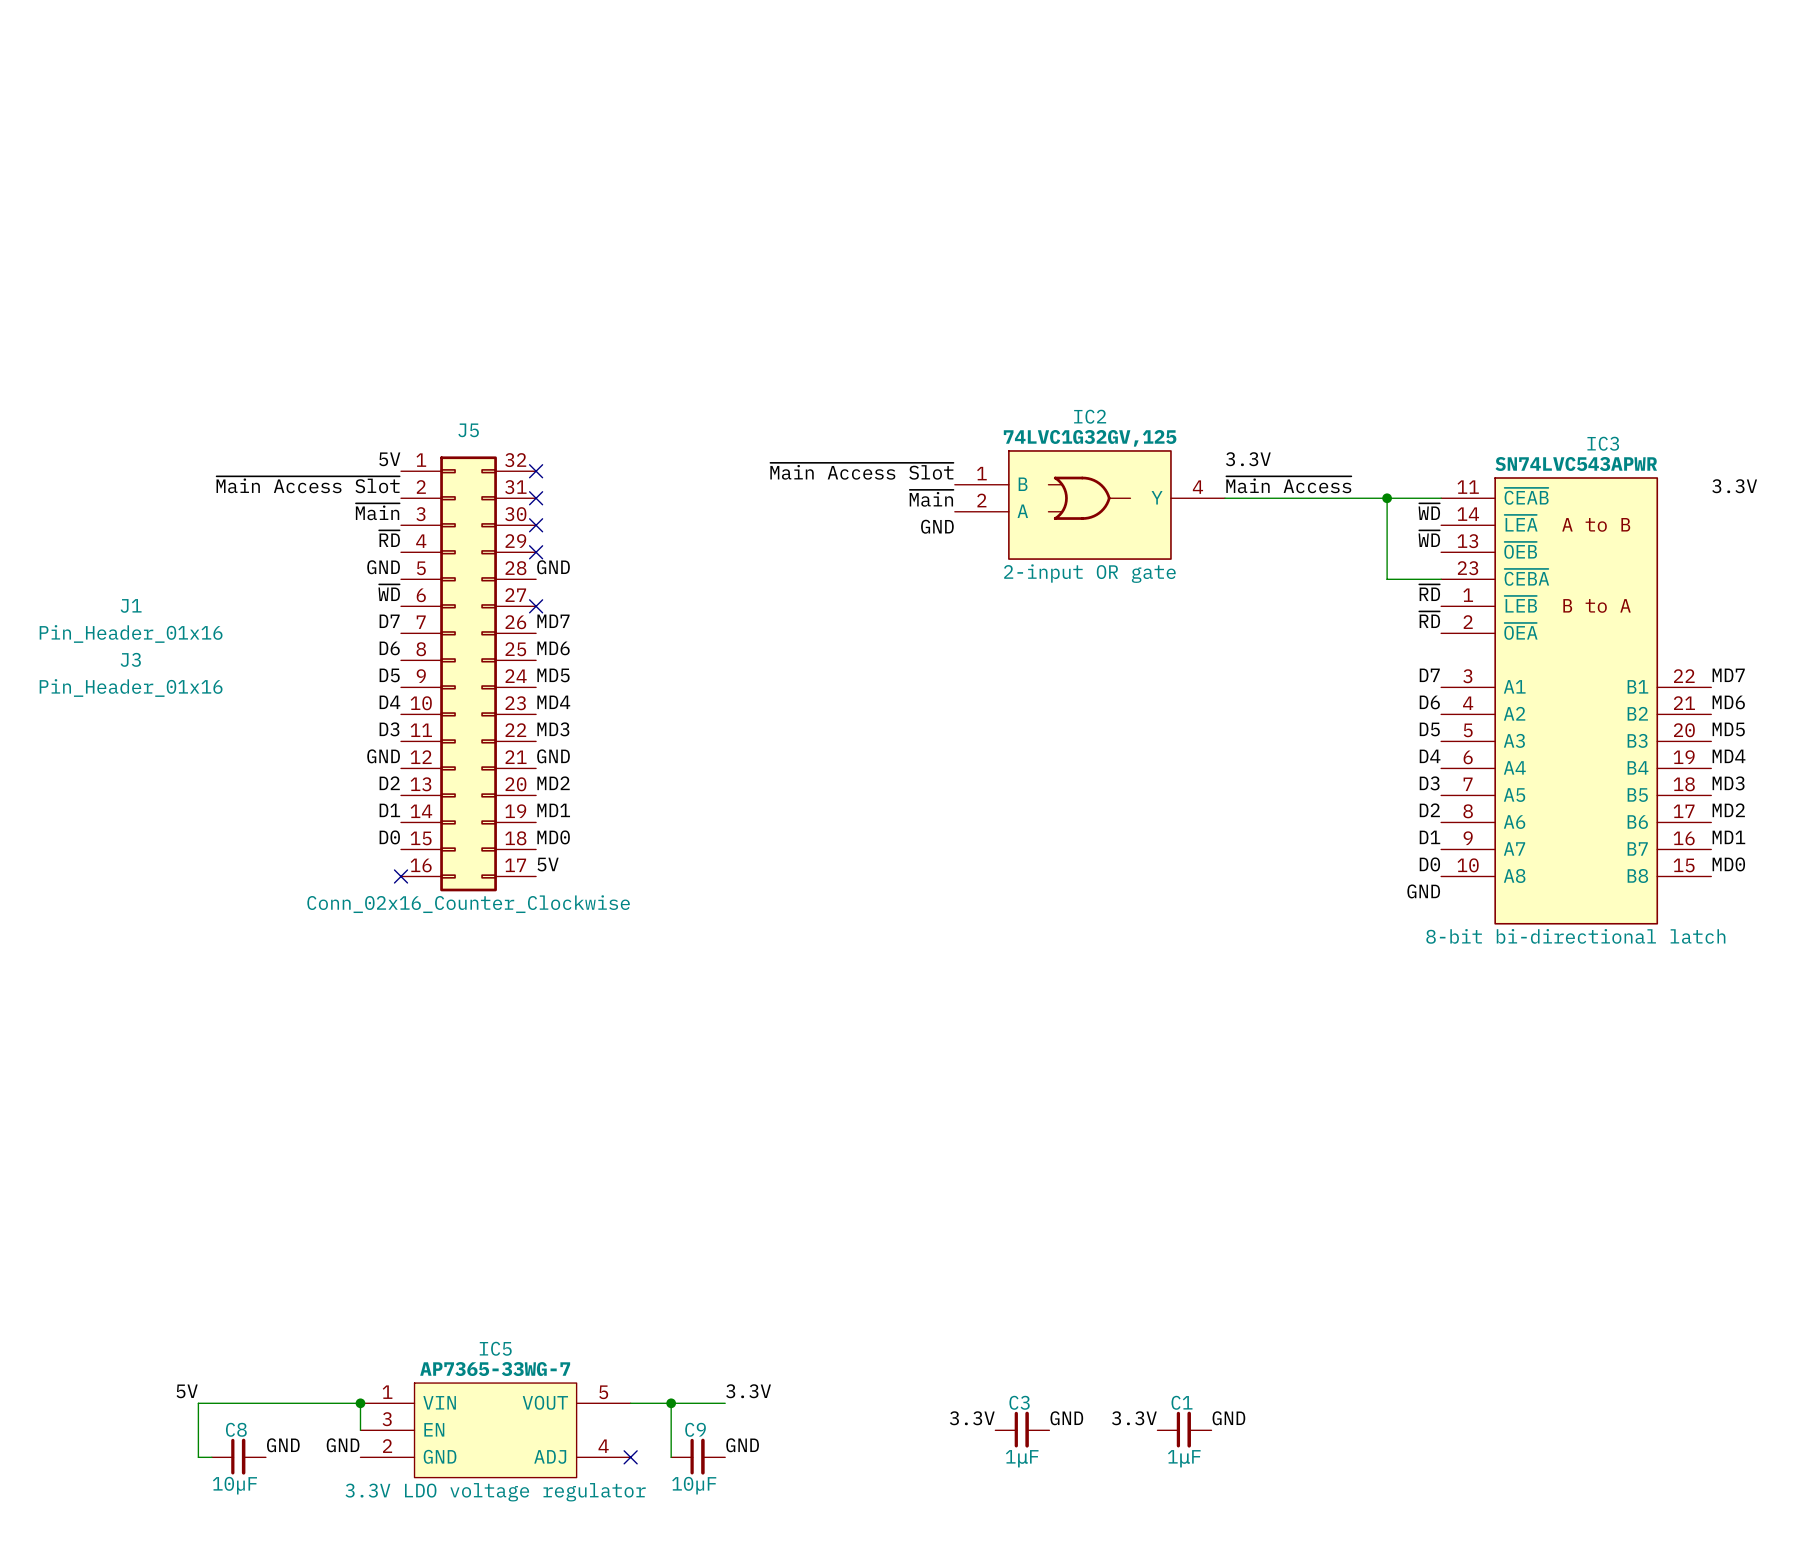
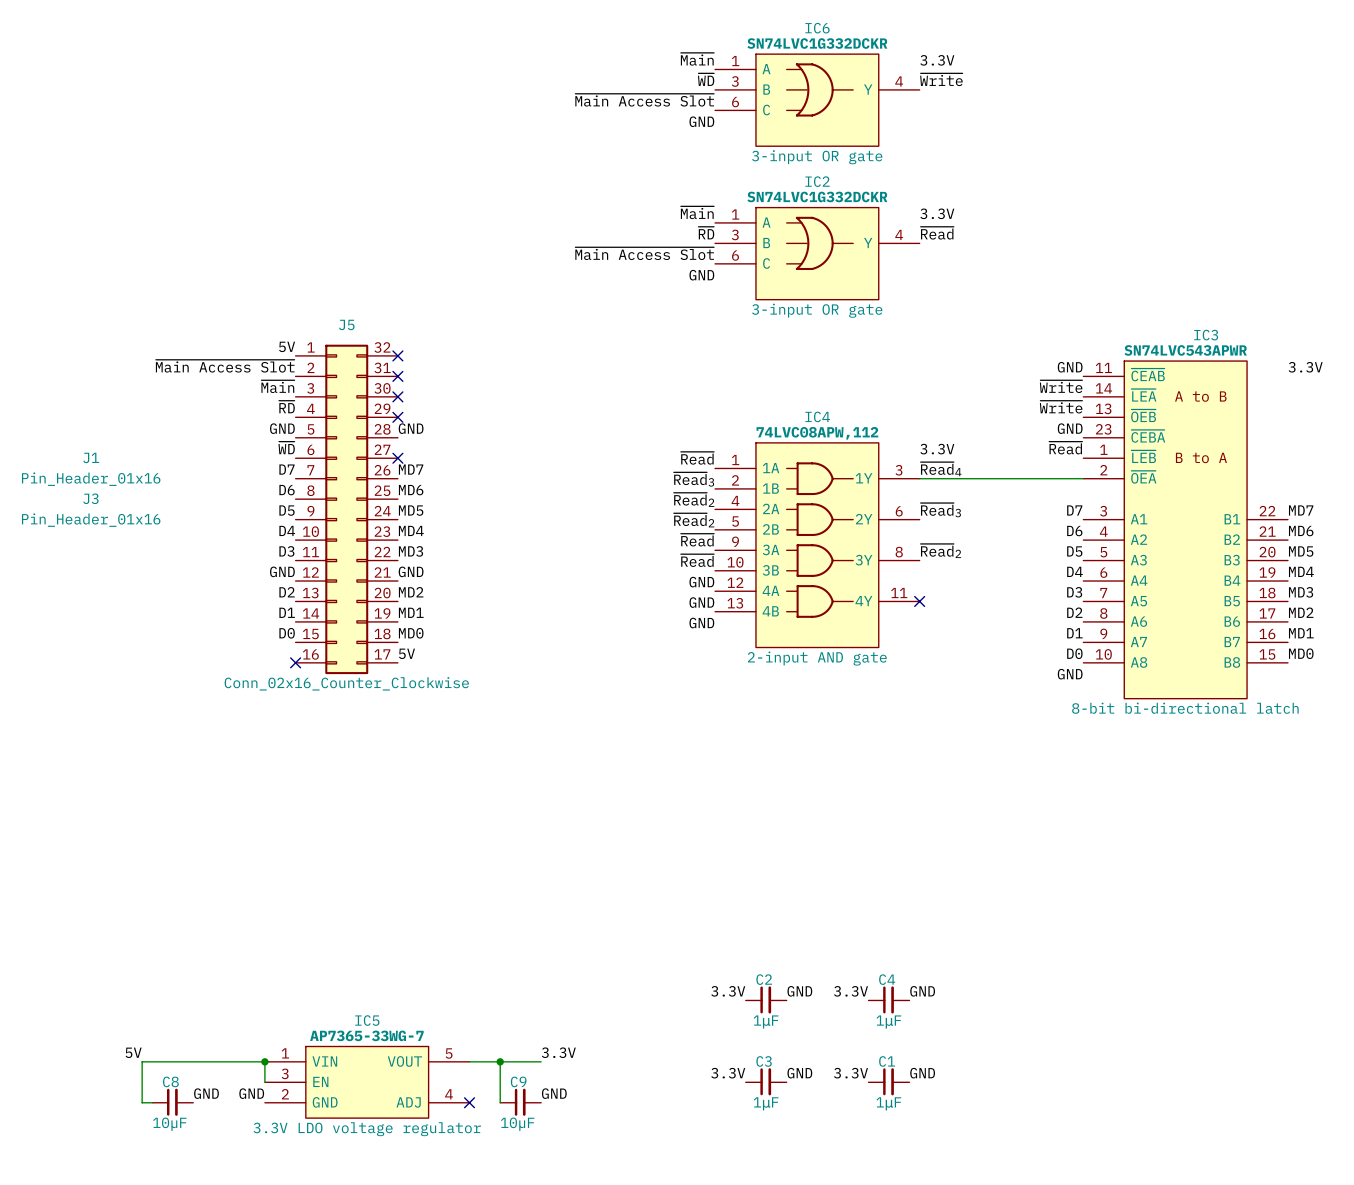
label: none -> ~{Main} (697, 59)
label: none -> 3.3V (937, 60)
label: none -> ~{WD} (706, 79)
label: none -> ~{Write} (941, 79)
label: none -> ~{Main Access Slot} (644, 100)
IC6: none -> SN74LVC1G332DCKR (817, 100)
label: none -> GND (701, 121)
label: none -> ~{Main} (697, 212)
label: none -> 3.3V (937, 213)
label: none -> ~{RD} (706, 233)
label: none -> ~{Read} (937, 233)
label: none -> GND (701, 275)
IC2 value: 74LVC1G32GV,125 (1090, 438) -> SN74LVC1G332DCKR (817, 196)
IC2 symbol: [954, 450, 1226, 560] -> [715, 206, 920, 301]
label: 3.3V (1248, 459) -> none
label position: ~{Main Access Slot} (861, 471) -> ~{Main Access Slot} (644, 253)
label: ~{Main Access} (1288, 484) -> none
label: none -> GND (1070, 367)
label: ~{Main} (931, 498) -> none
wire: (1225, 498) (1441, 498) -> (919, 478) (1083, 478)
wire: (1387, 498) (1387, 579) (1441, 579) -> none
junction: (1387, 498) -> none
label: ~{WD} (1429, 511) -> ~{Write} (1061, 386)
label: GND (937, 526) -> none
label: ~{WD} (1429, 538) -> ~{Write} (1061, 407)
label: none -> GND (1070, 428)
IC2 text: 2-input OR gate (1089, 573) -> 3-input OR gate (817, 310)
label: ~{RD} (1429, 592) -> ~{Read} (1065, 448)
label: none -> 3.3V (937, 449)
label: none -> ~{Read} (697, 458)
label: ~{RD} (1429, 619) -> none
label: none -> ~{Read}4 (941, 469)
label: none -> ~{Read}3 (693, 479)
label: none -> ~{Read}2 (694, 499)
label: none -> ~{Read}3 (940, 510)
label: none -> ~{Read}2 (694, 520)
label: none -> ~{Read} (697, 540)
IC4: none -> 74LVC08APW,112 (817, 545)
label: none -> ~{Read}2 (940, 551)
label: none -> ~{Read} (697, 560)
label: none -> GND (701, 582)
no-connect mark: none -> (919, 601)
label: none -> GND (701, 602)
label: none -> GND (701, 623)
label: none -> 3.3V (728, 991)
label: none -> GND (799, 991)
label: none -> 3.3V (851, 991)
label: none -> GND (922, 991)
C2: none -> 1μF (766, 999)
C4: none -> 1μF (888, 999)

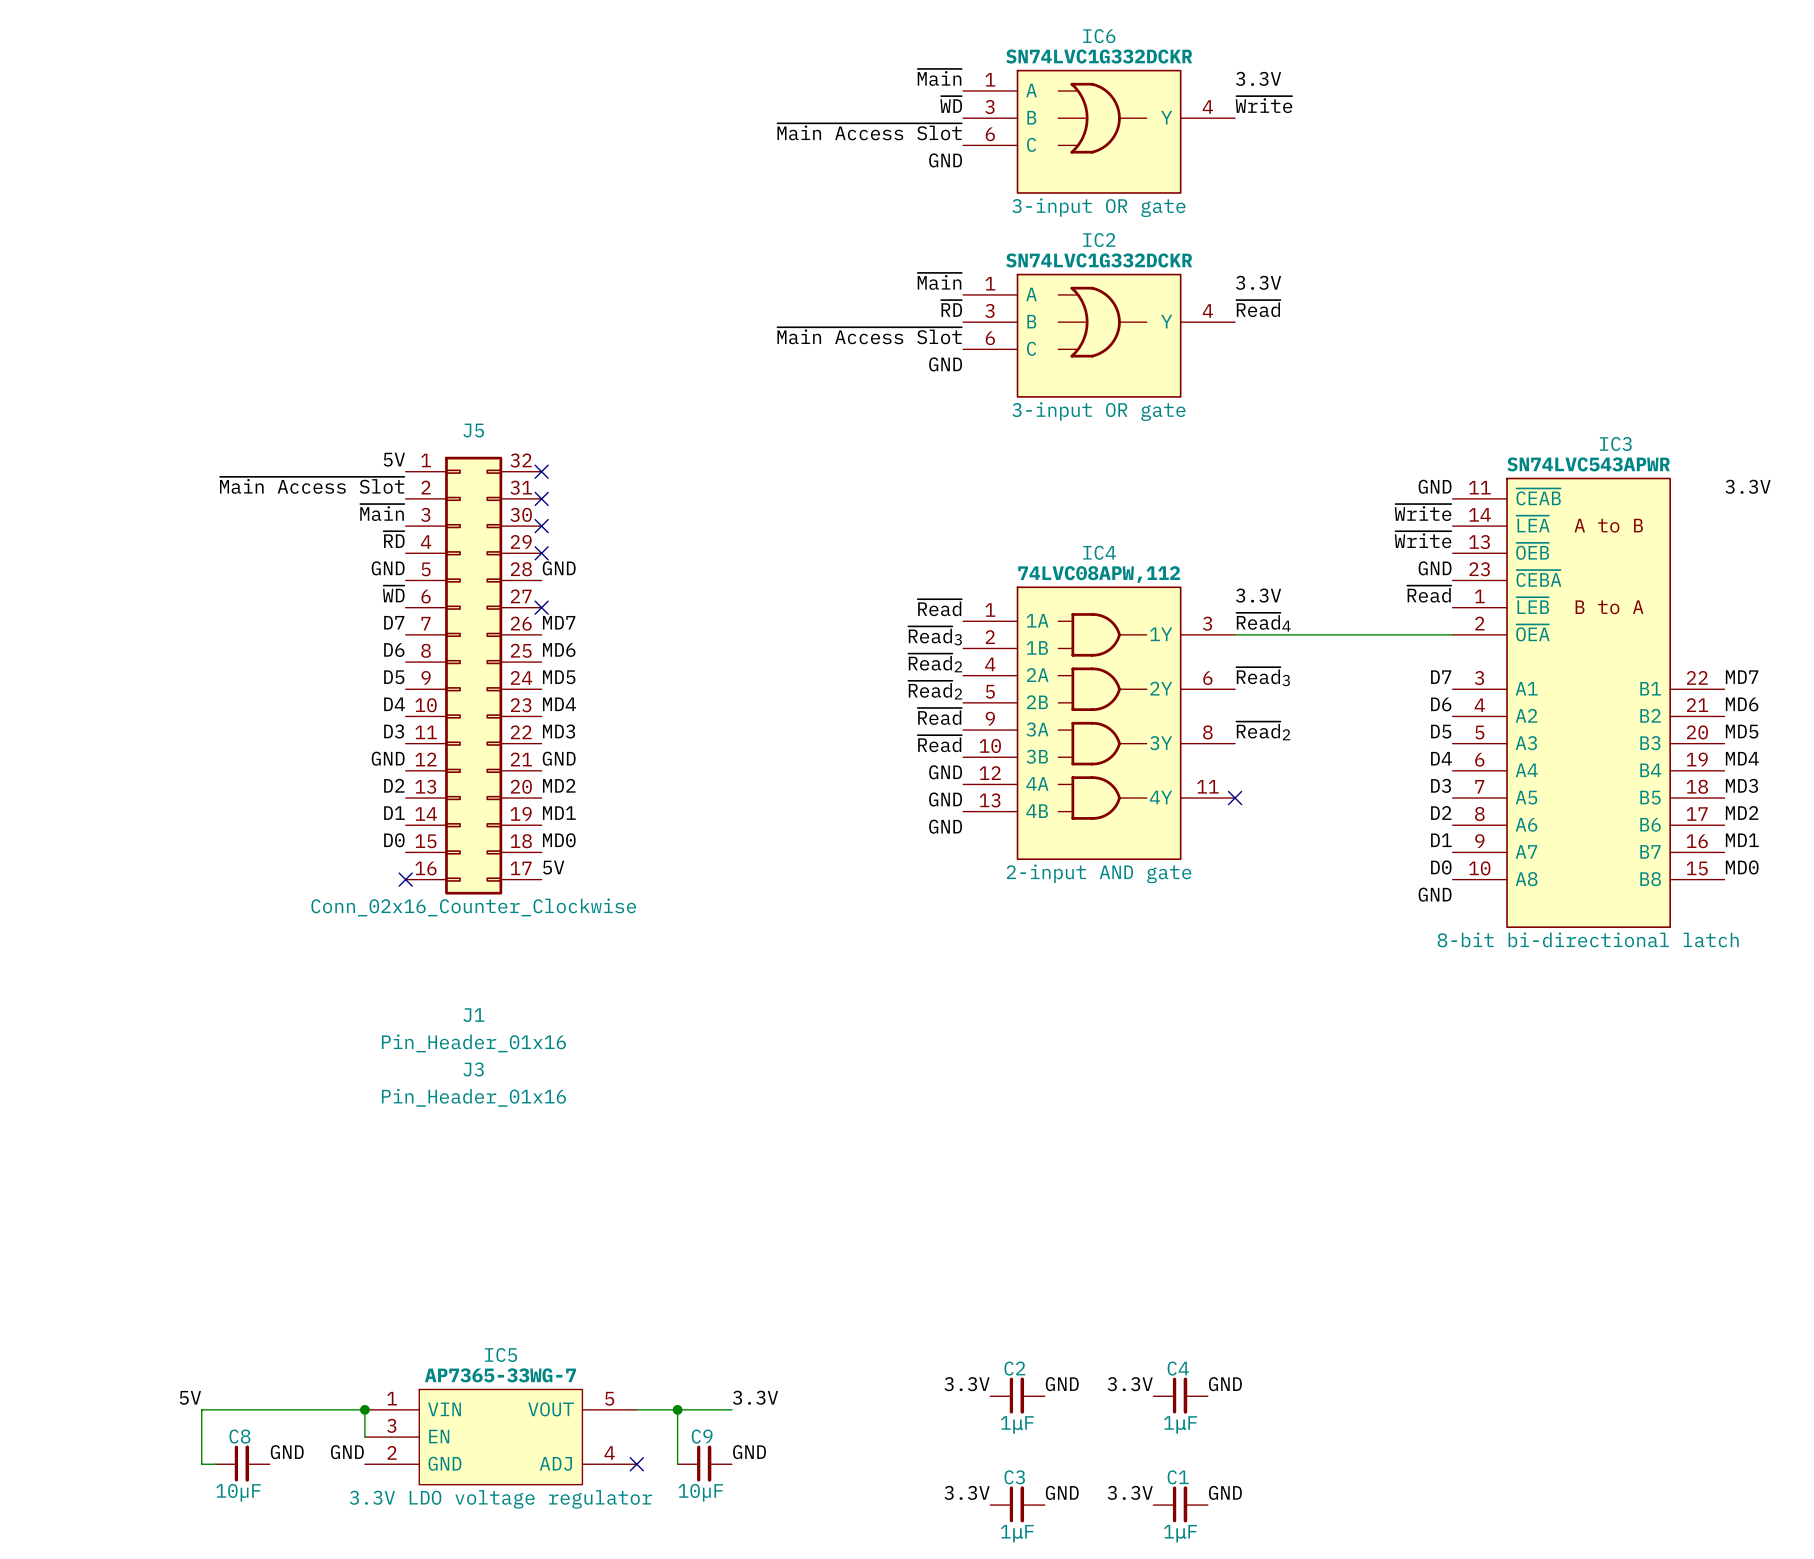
J1 position: (91, 469) -> (473, 1030)
J3 position: (91, 510) -> (473, 1084)
label: 3.3V (728, 991) -> none
label: GND (799, 991) -> none
label: 3.3V (851, 991) -> none
label: GND (922, 991) -> none
C2 position: (766, 999) -> (1017, 1395)
C4 position: (888, 999) -> (1180, 1395)
label: none -> 3.3V (967, 1384)
label: none -> GND (1062, 1384)
label: none -> 3.3V (1130, 1384)
label: none -> GND (1225, 1384)
label: 3.3V (728, 1073) -> none
label: GND (799, 1073) -> none
label: 3.3V (851, 1073) -> none
label: GND (922, 1073) -> none
C3 position: (766, 1081) -> (1017, 1504)
C1 position: (888, 1081) -> (1180, 1504)
label: none -> 3.3V (967, 1492)
label: none -> GND (1062, 1492)
label: none -> 3.3V (1130, 1492)
label: none -> GND (1225, 1492)

